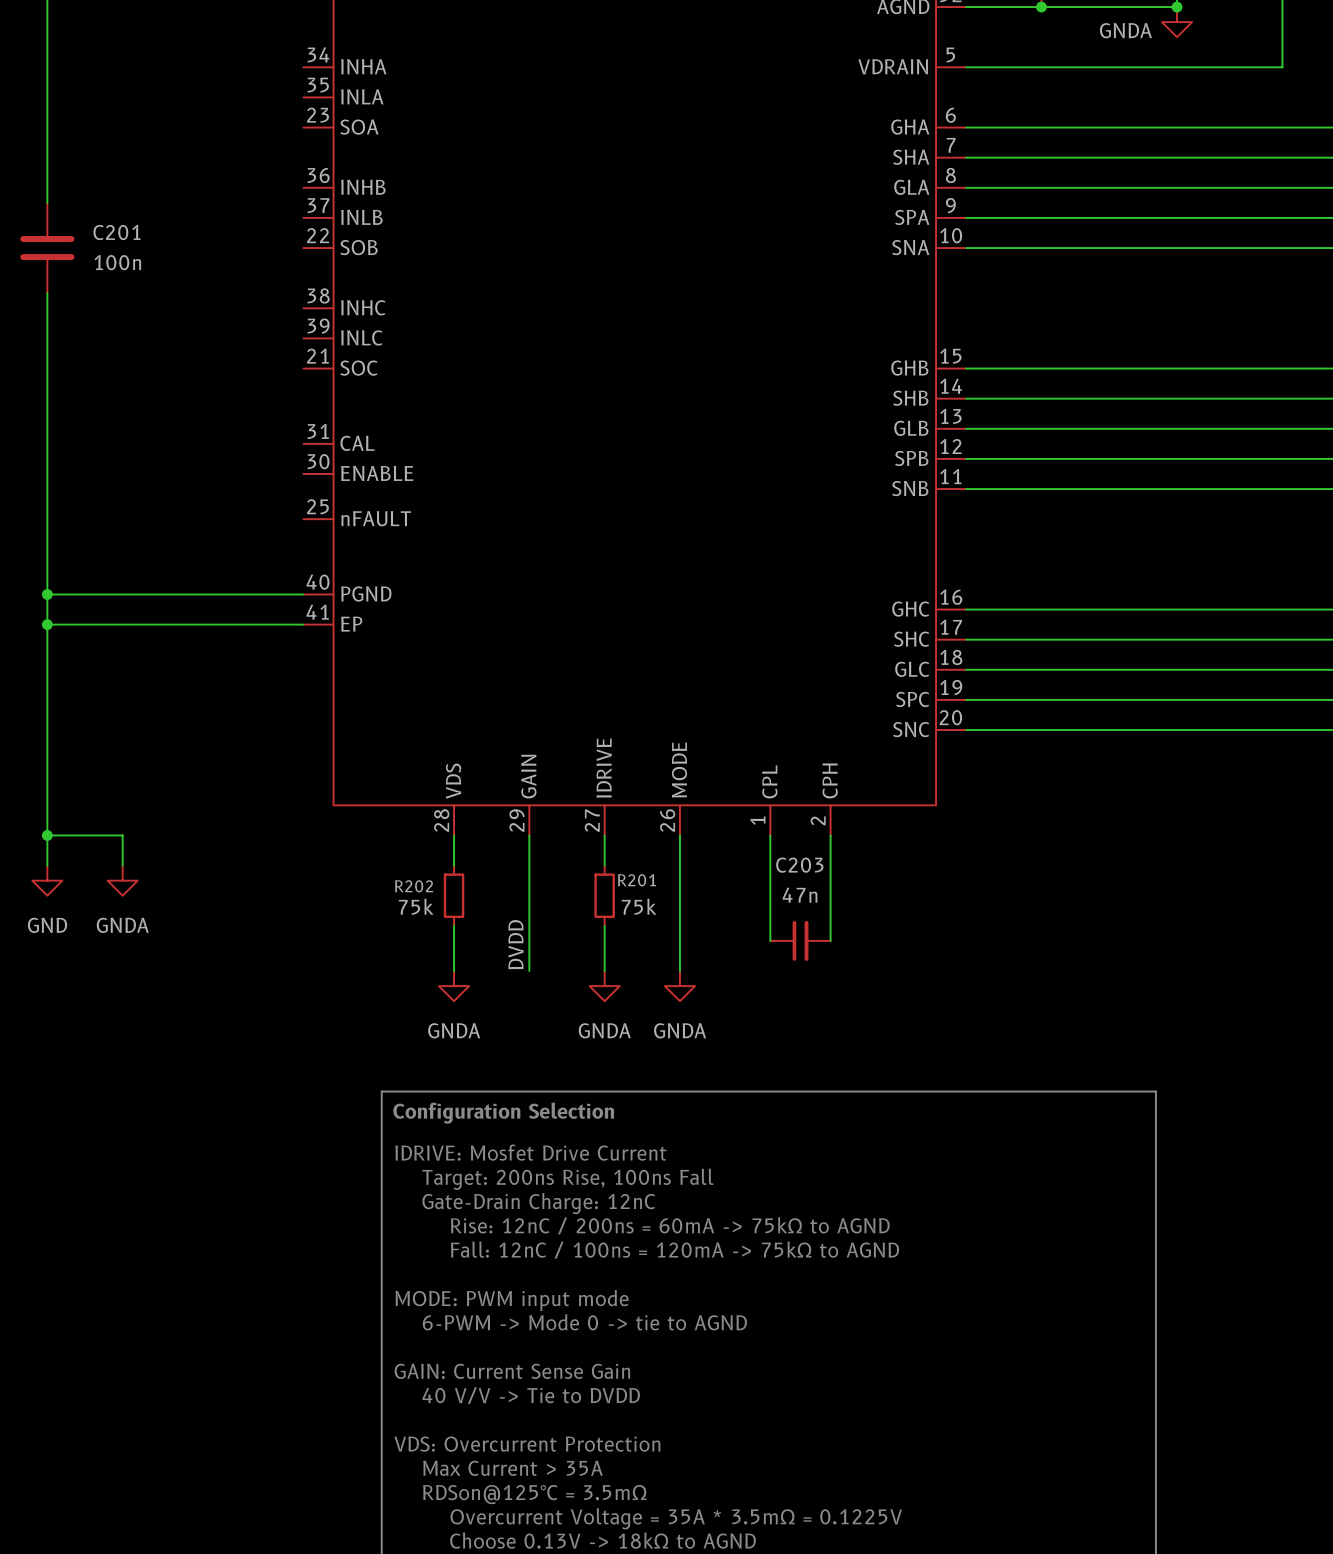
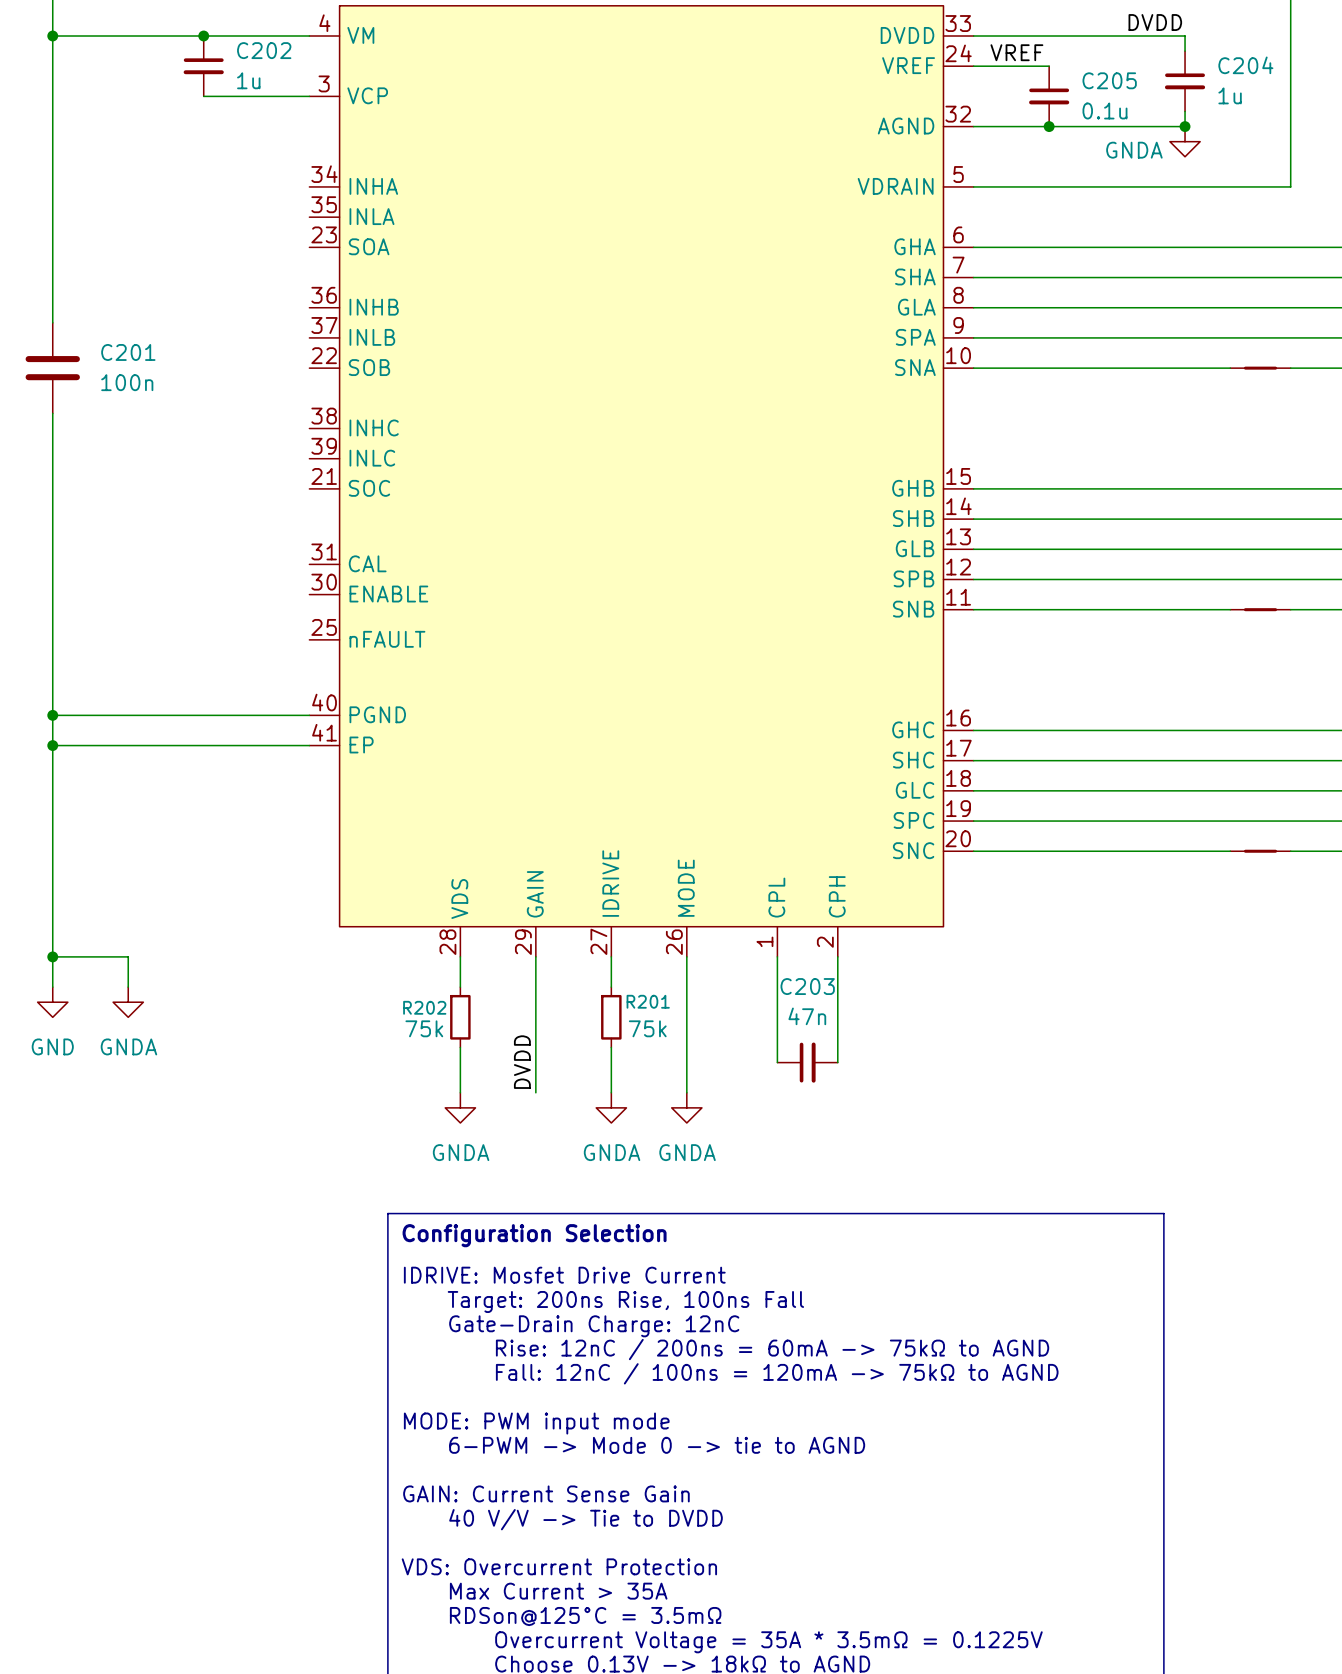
part: none -> (1260, 368)
part: none -> (1260, 609)
part: none -> (1260, 851)

